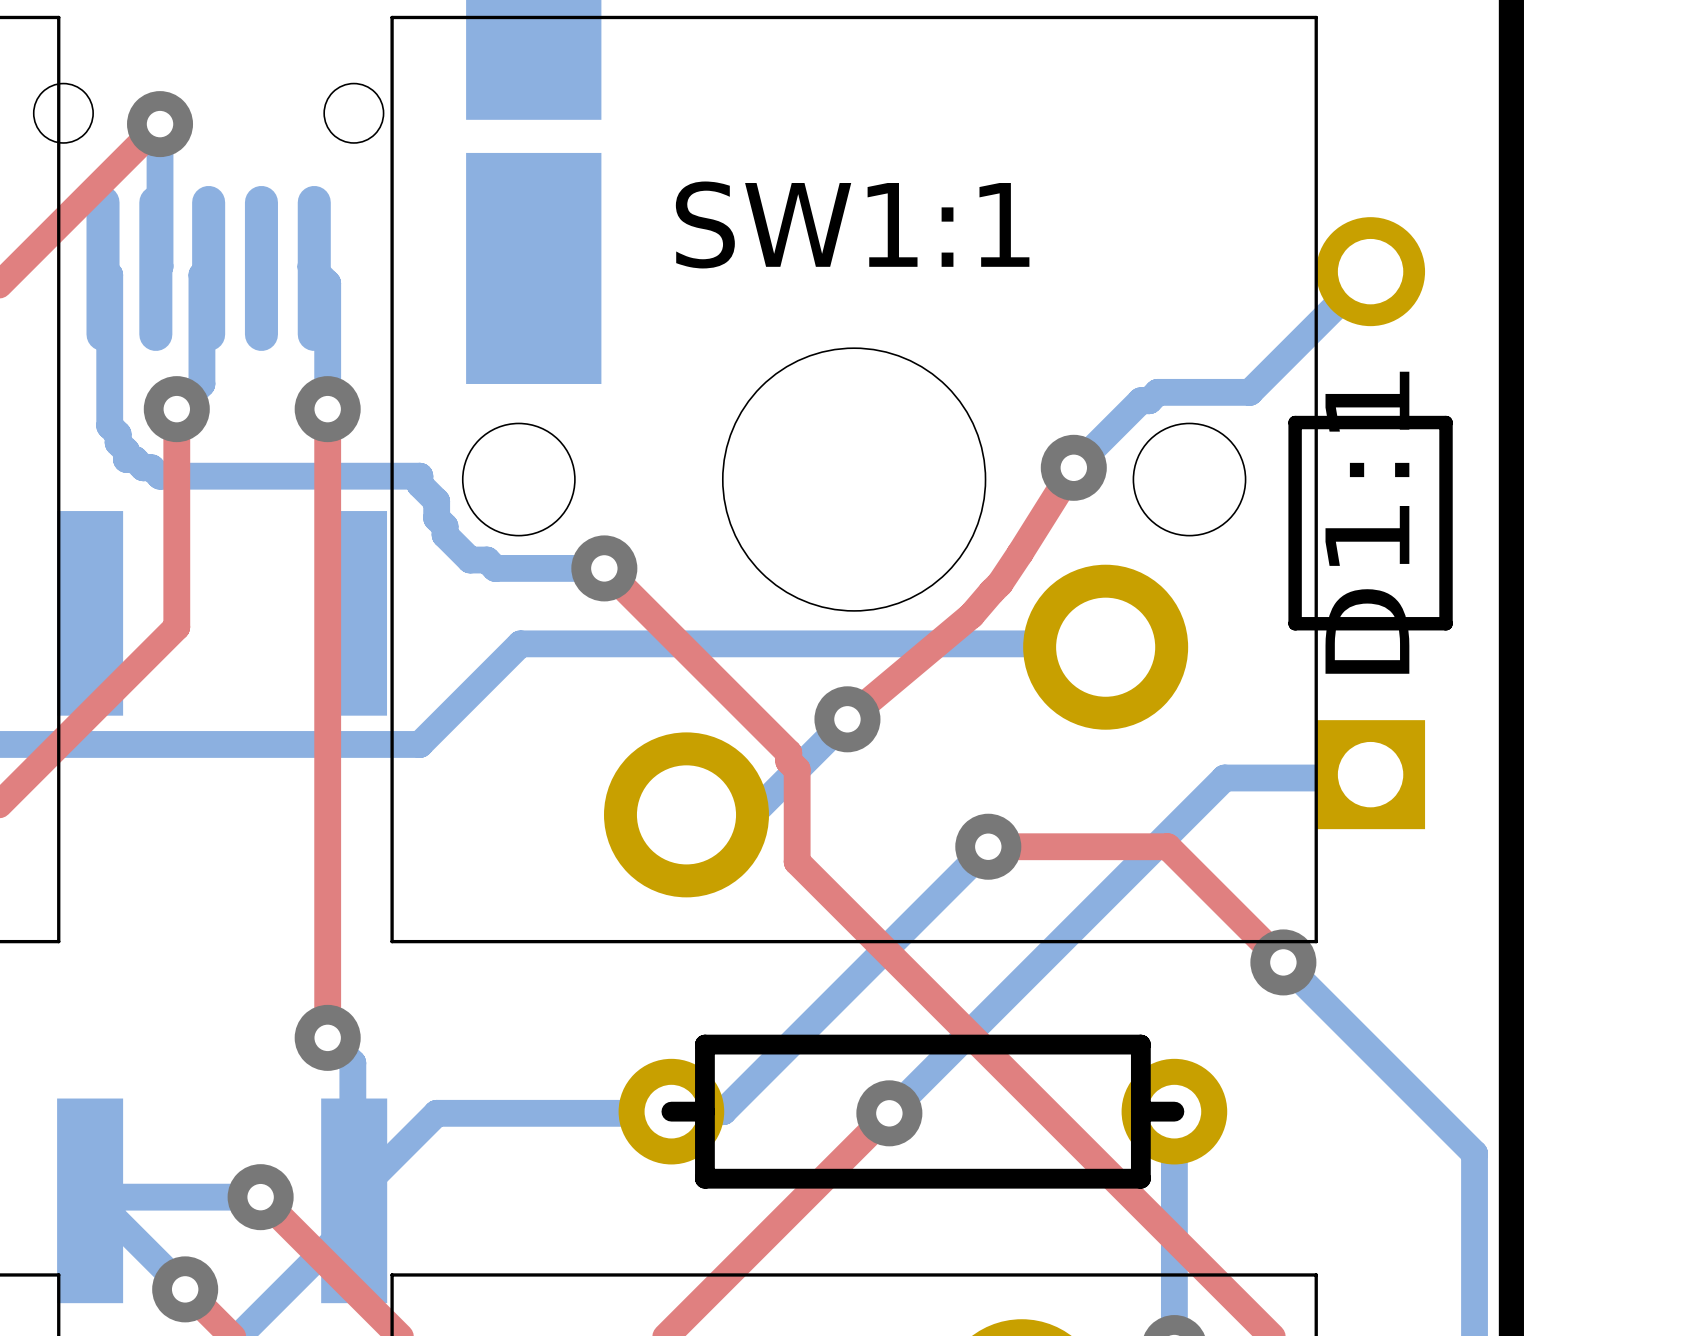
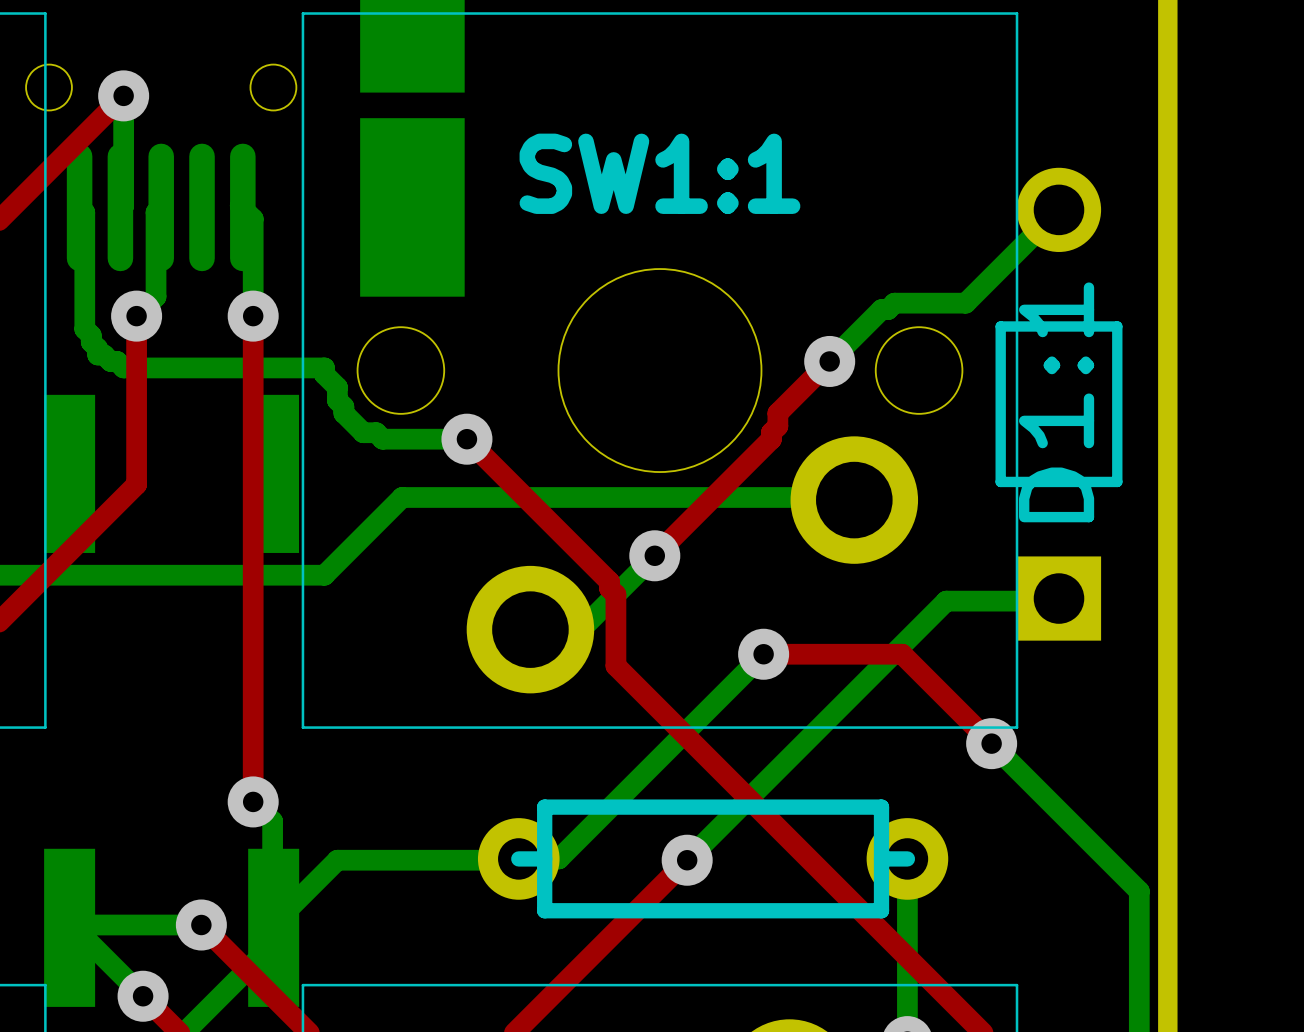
top track: (1073, 467) (1000, 583) (971, 615) (847, 719) -> (829, 361) (777, 413) (777, 426) (771, 432) (771, 439) (654, 555)

